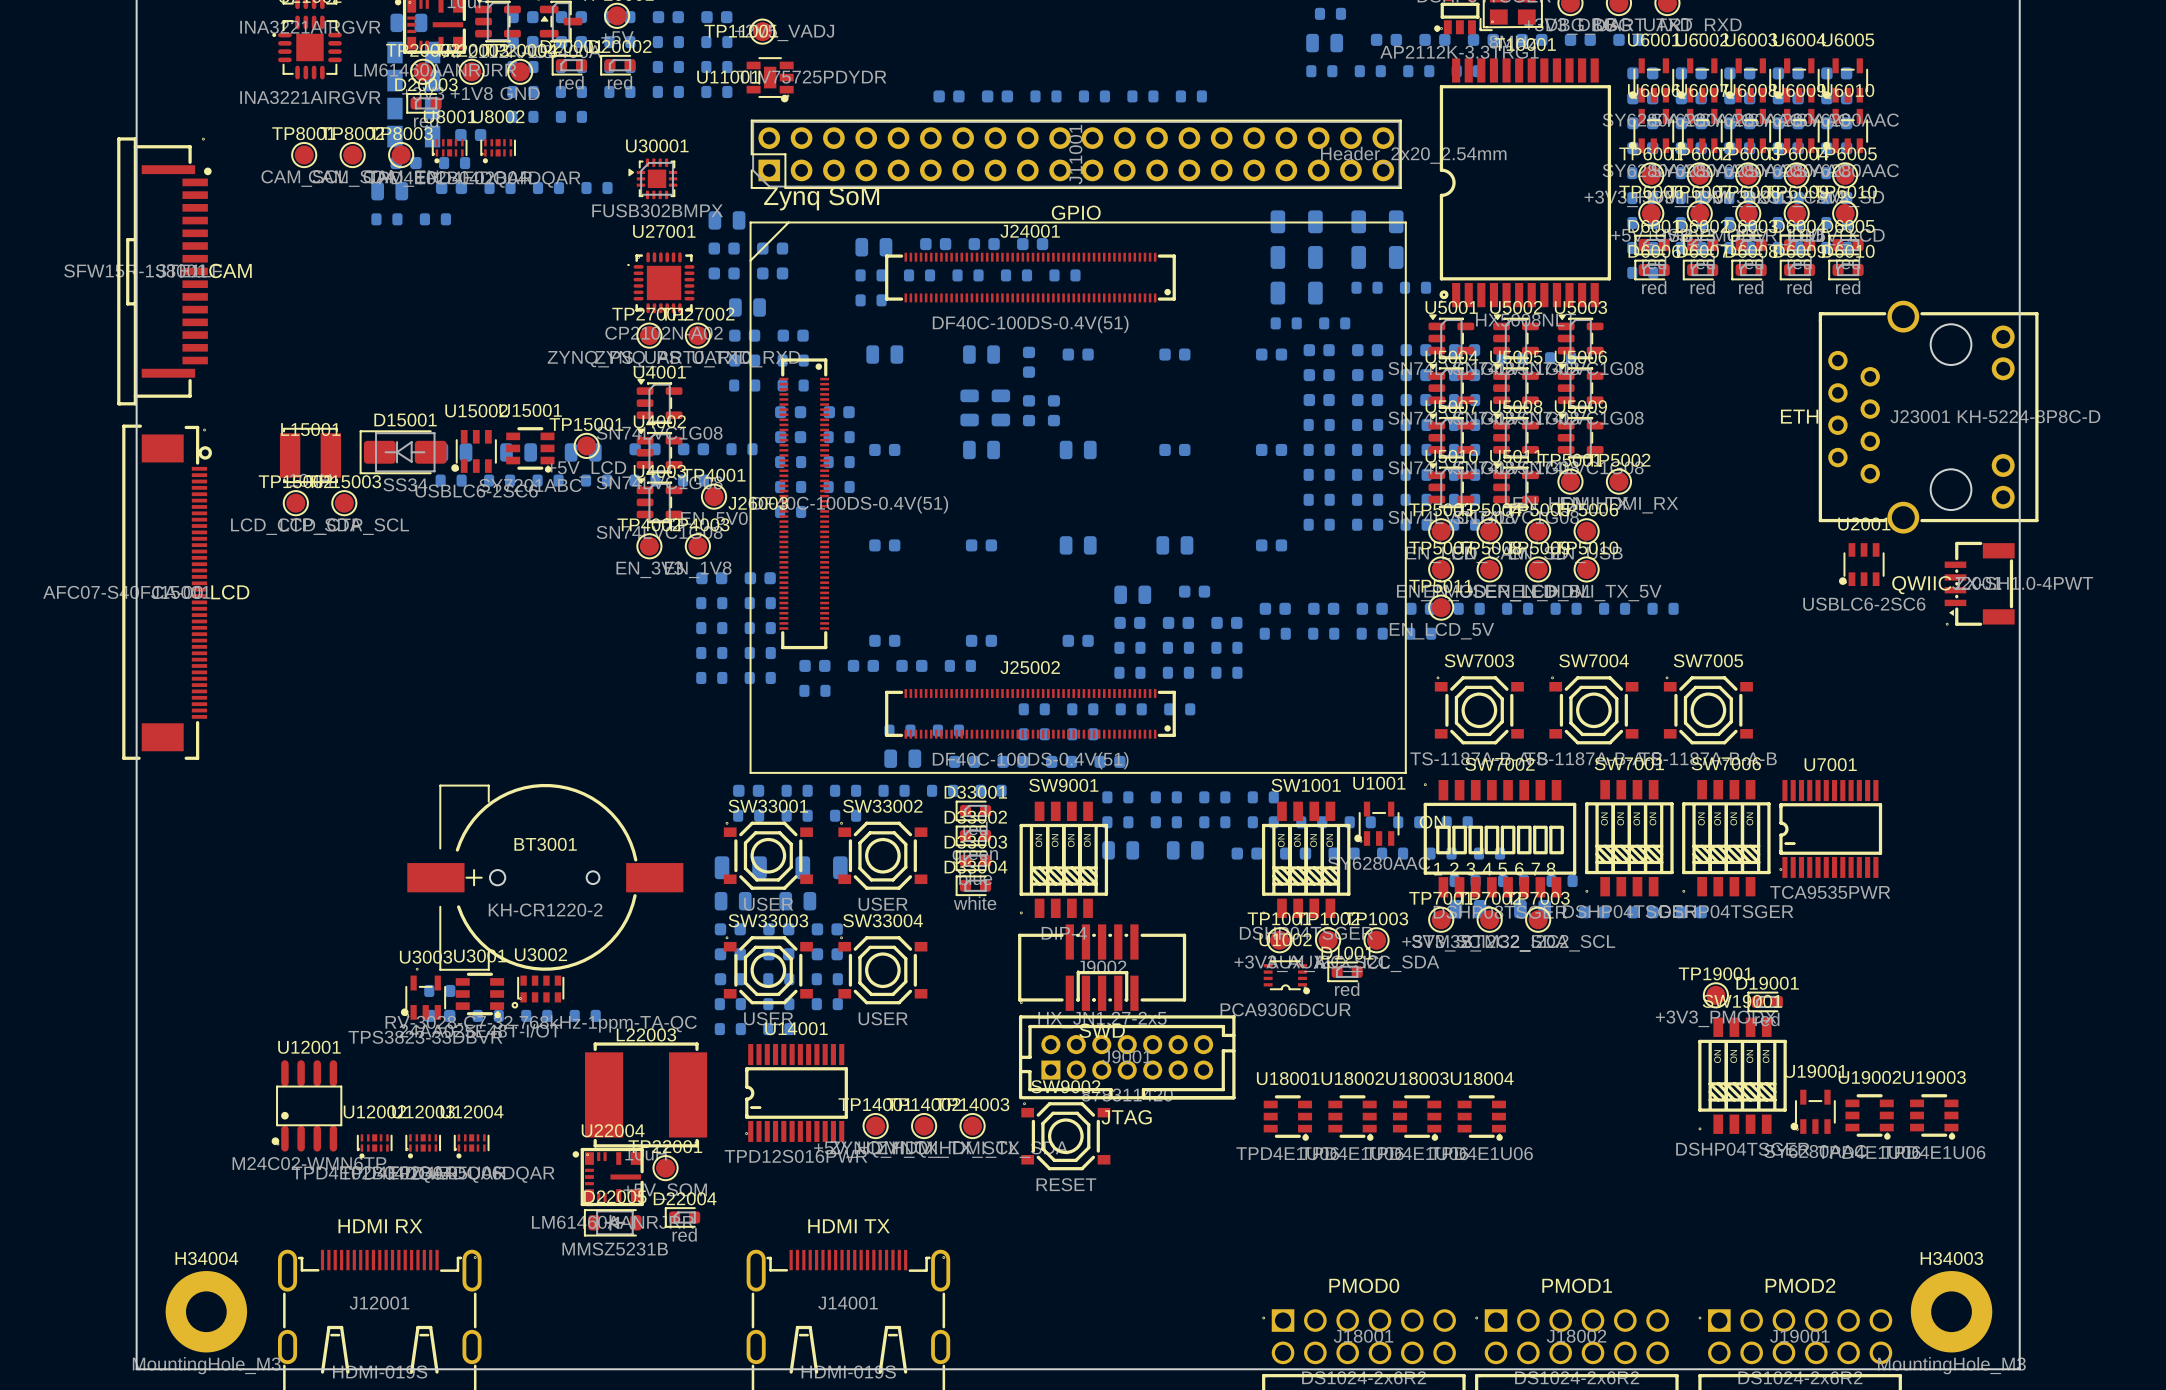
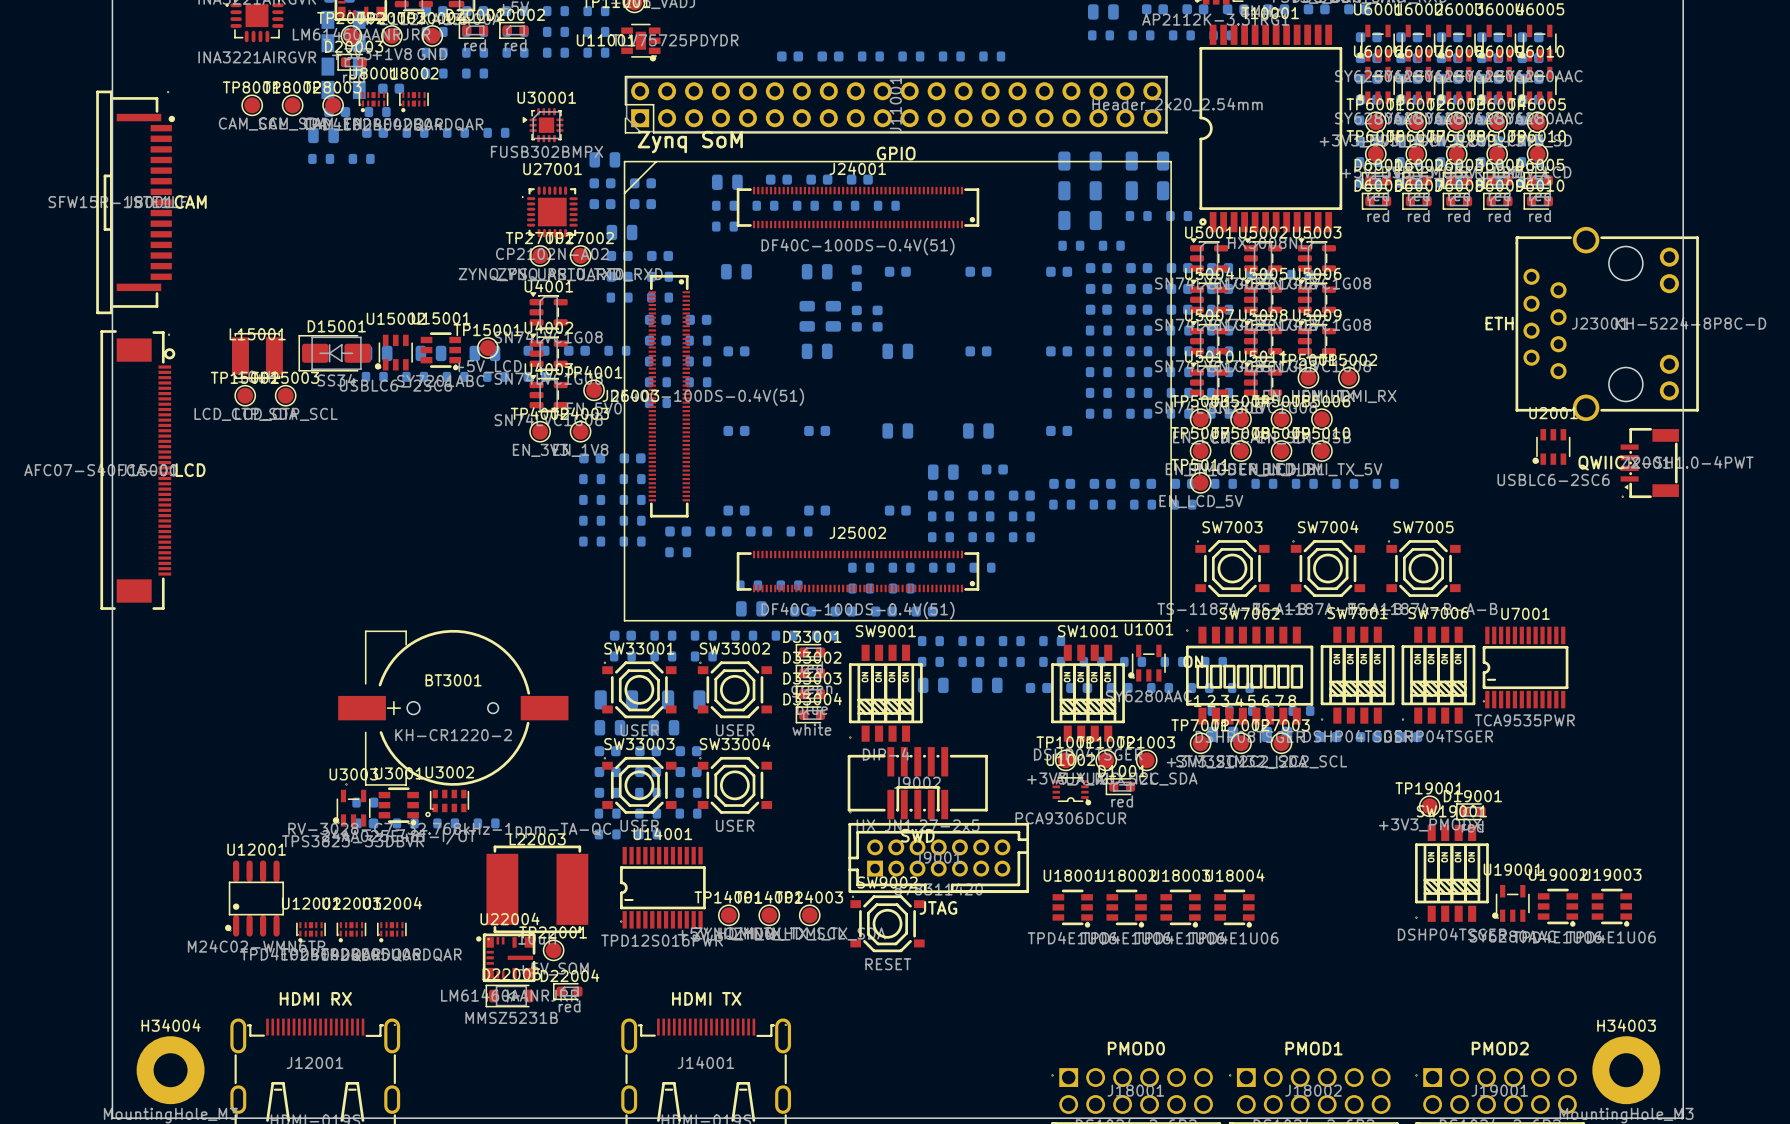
part: (1642, 272) -> none
part: (693, 480) -> none

